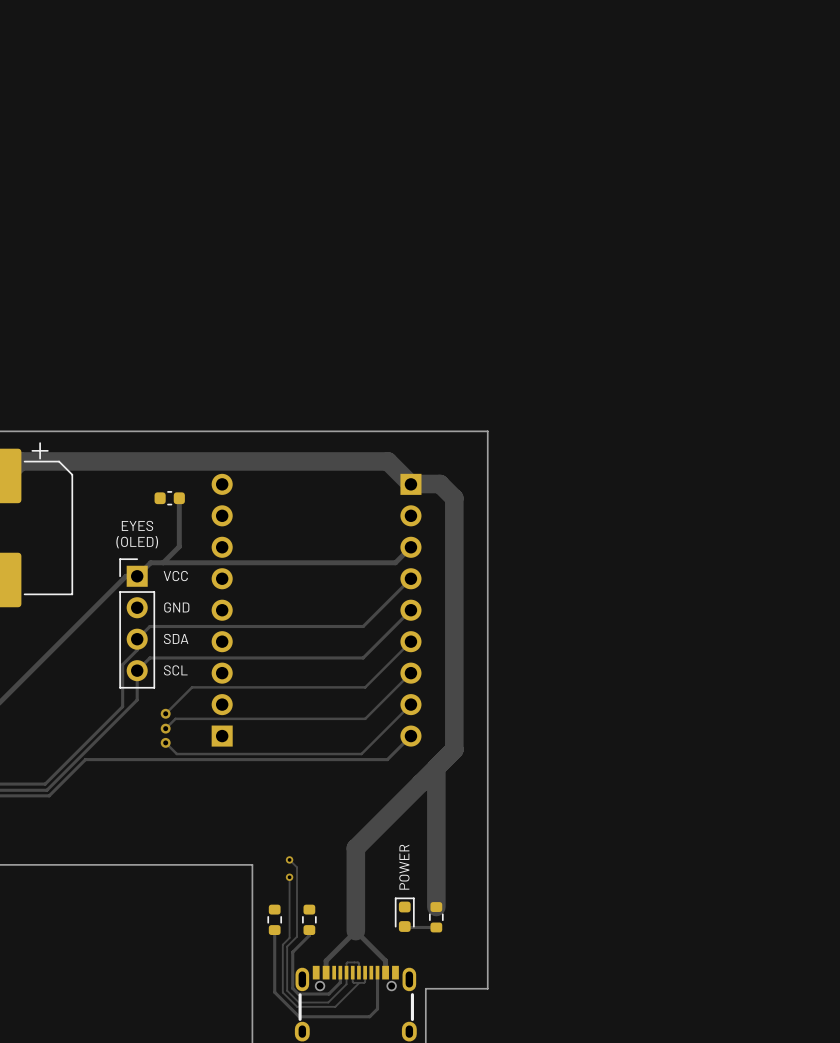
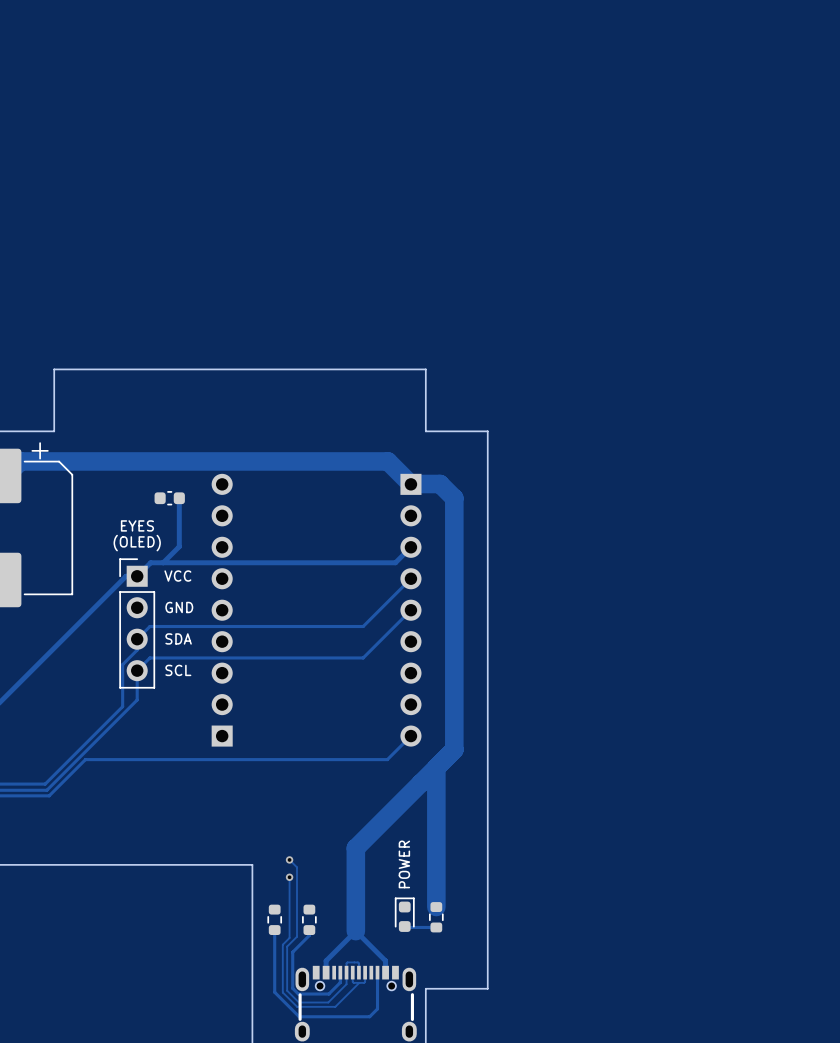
board edge: (54, 431) (425, 431) -> (54, 431) (54, 369) (425, 369) (425, 431)
track: (410, 641) (365, 687) (192, 687) (165, 713) -> none
track: (410, 673) (365, 718) (175, 718) (165, 728) -> none
track: (410, 704) (361, 754) (176, 754) (165, 742) -> none
via: (165, 713) -> none
via: (165, 728) -> none
via: (165, 742) -> none

